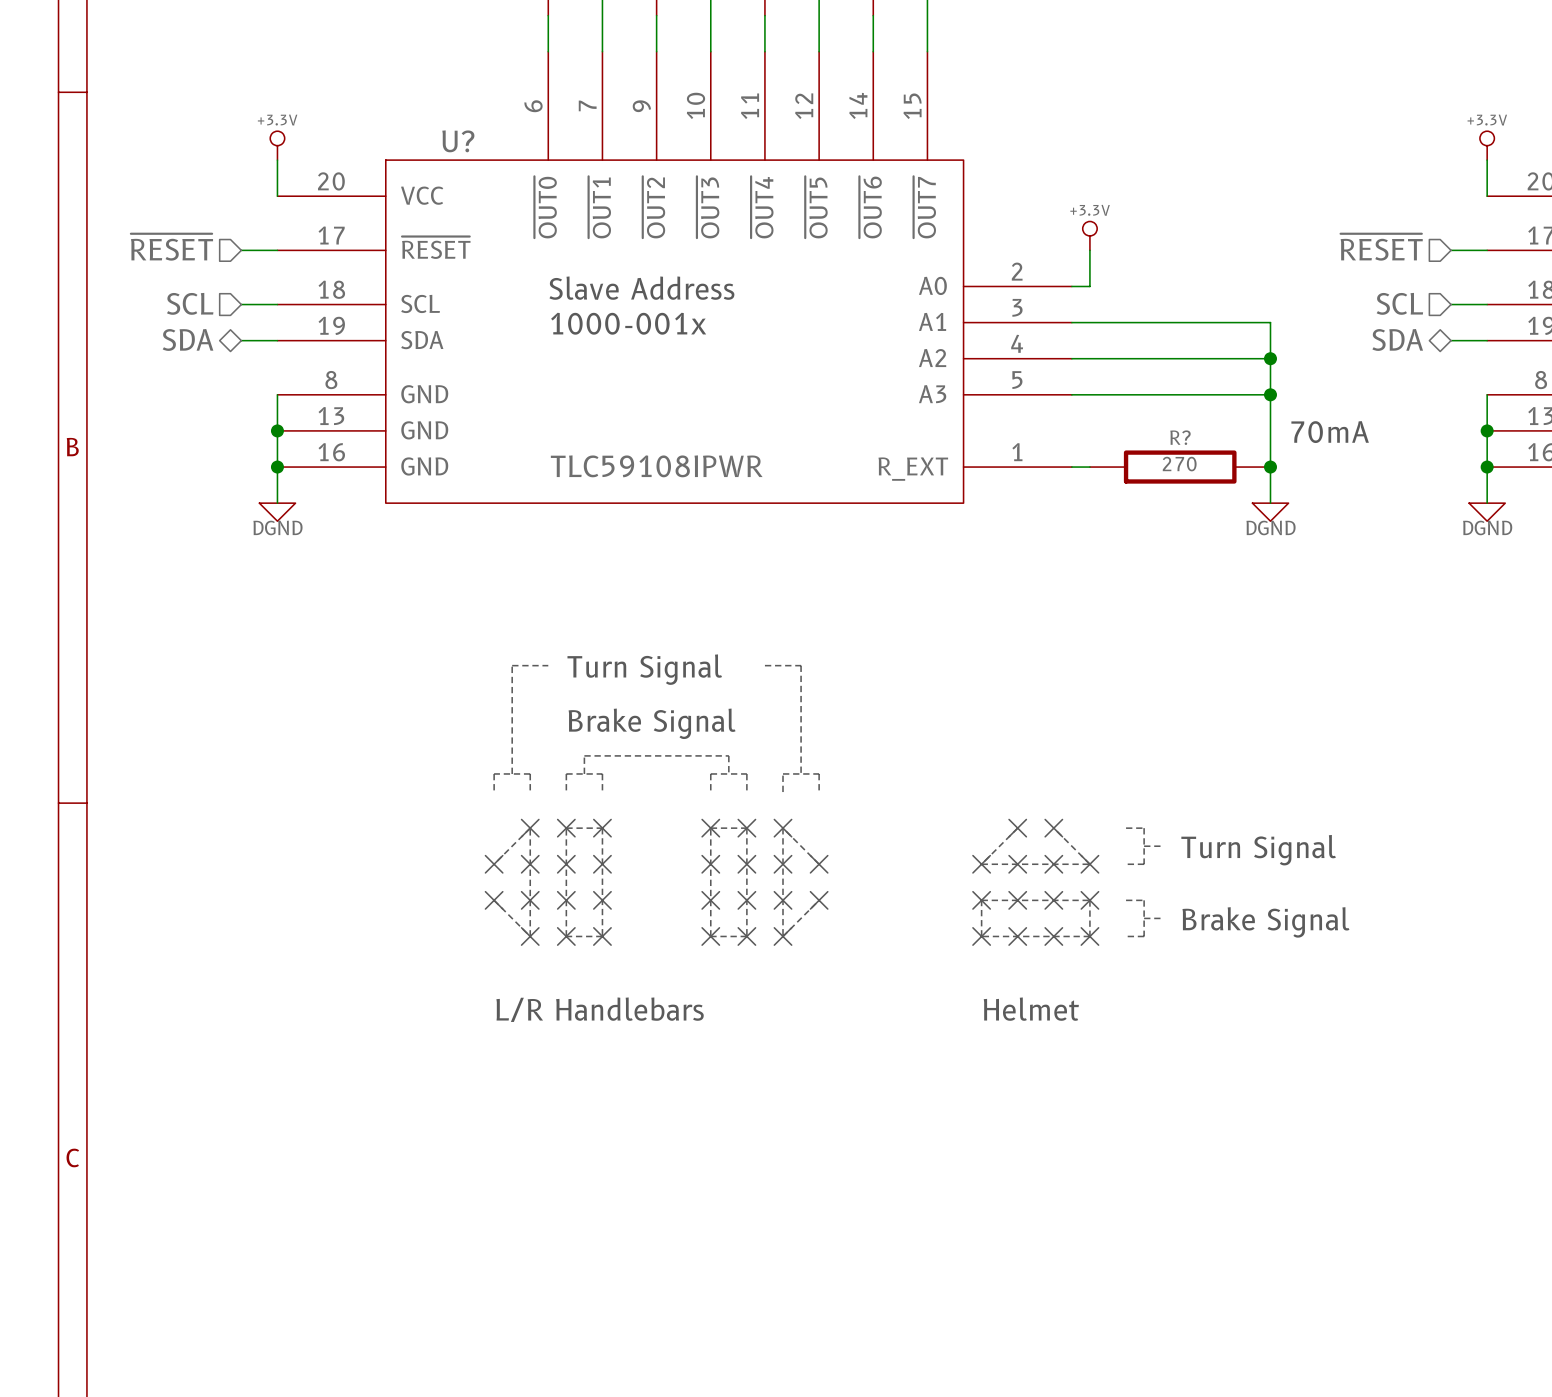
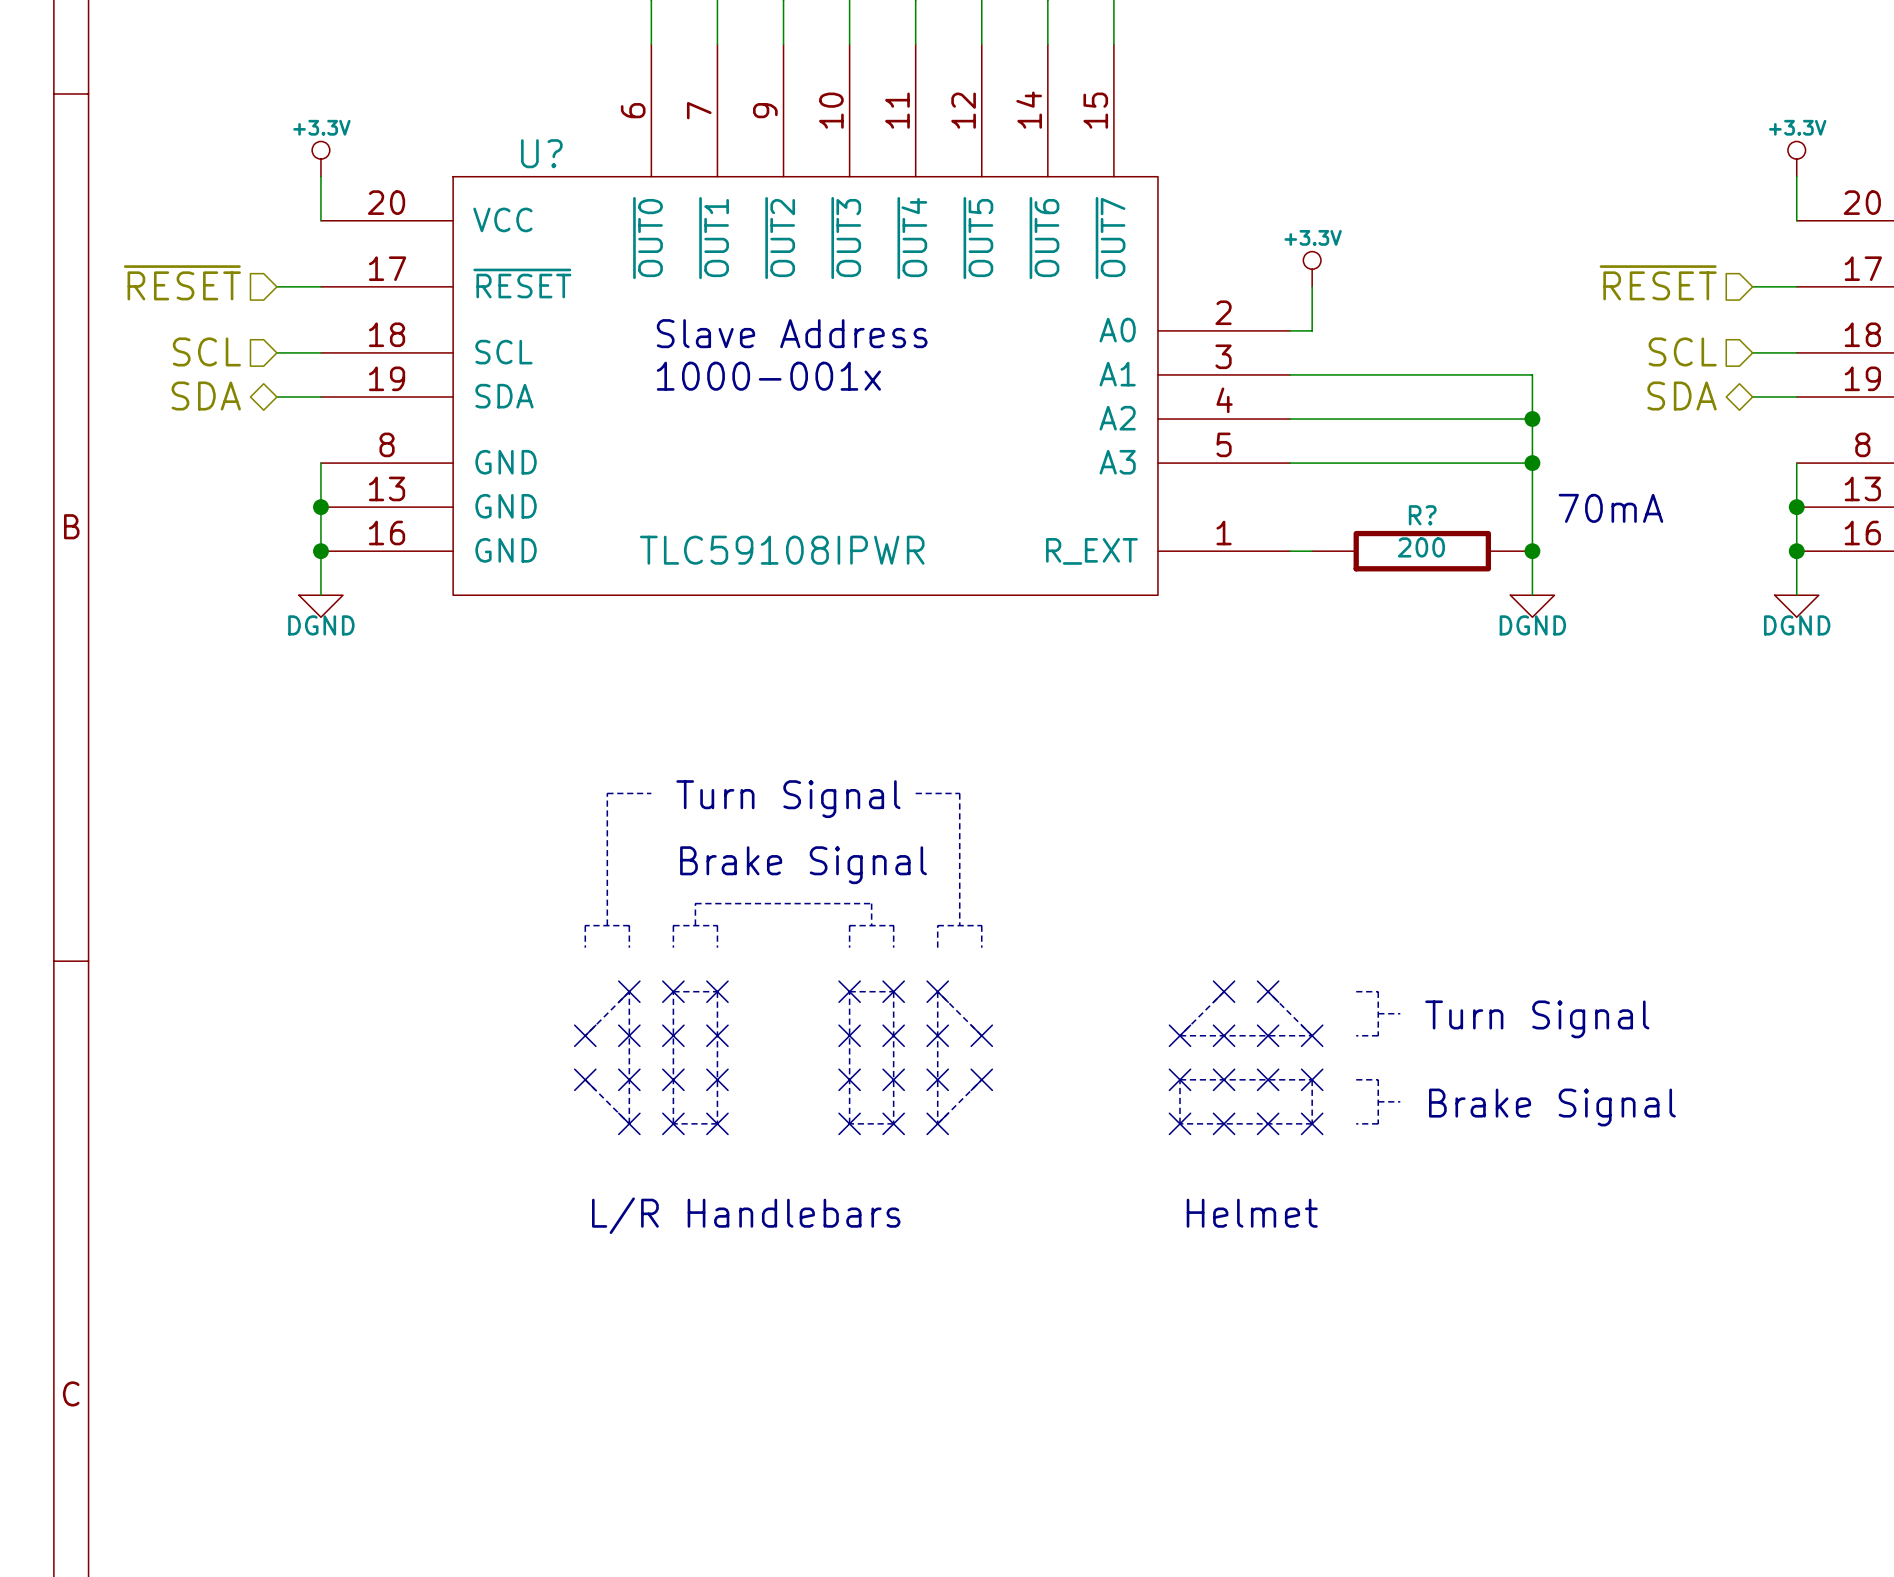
R? value: 270 (1179, 464) -> 200 (1421, 547)

